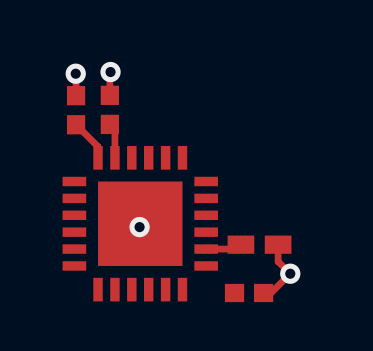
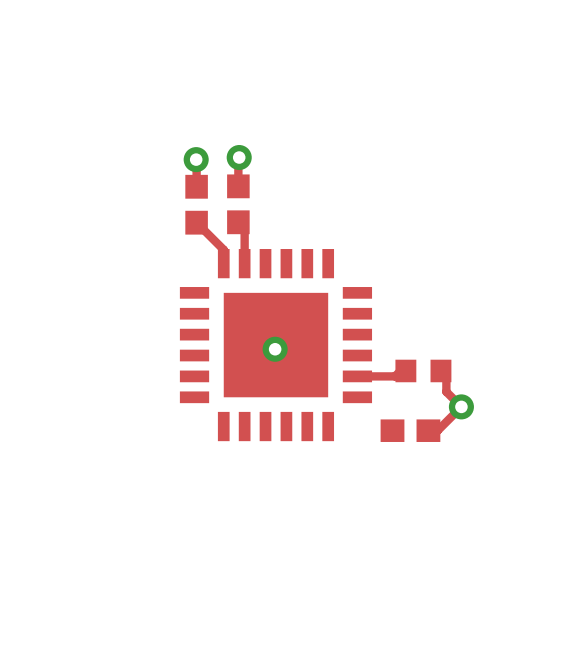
part footprint: [227, 235, 292, 254] -> [395, 359, 452, 383]

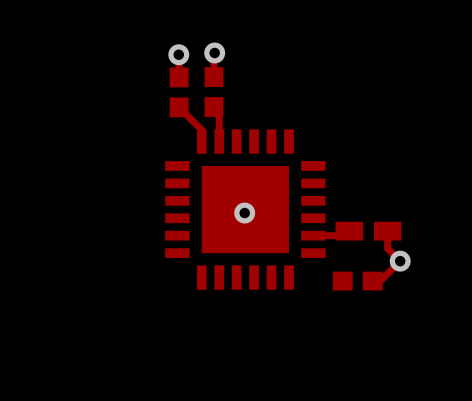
part footprint: [395, 359, 452, 383] -> [335, 221, 402, 241]

